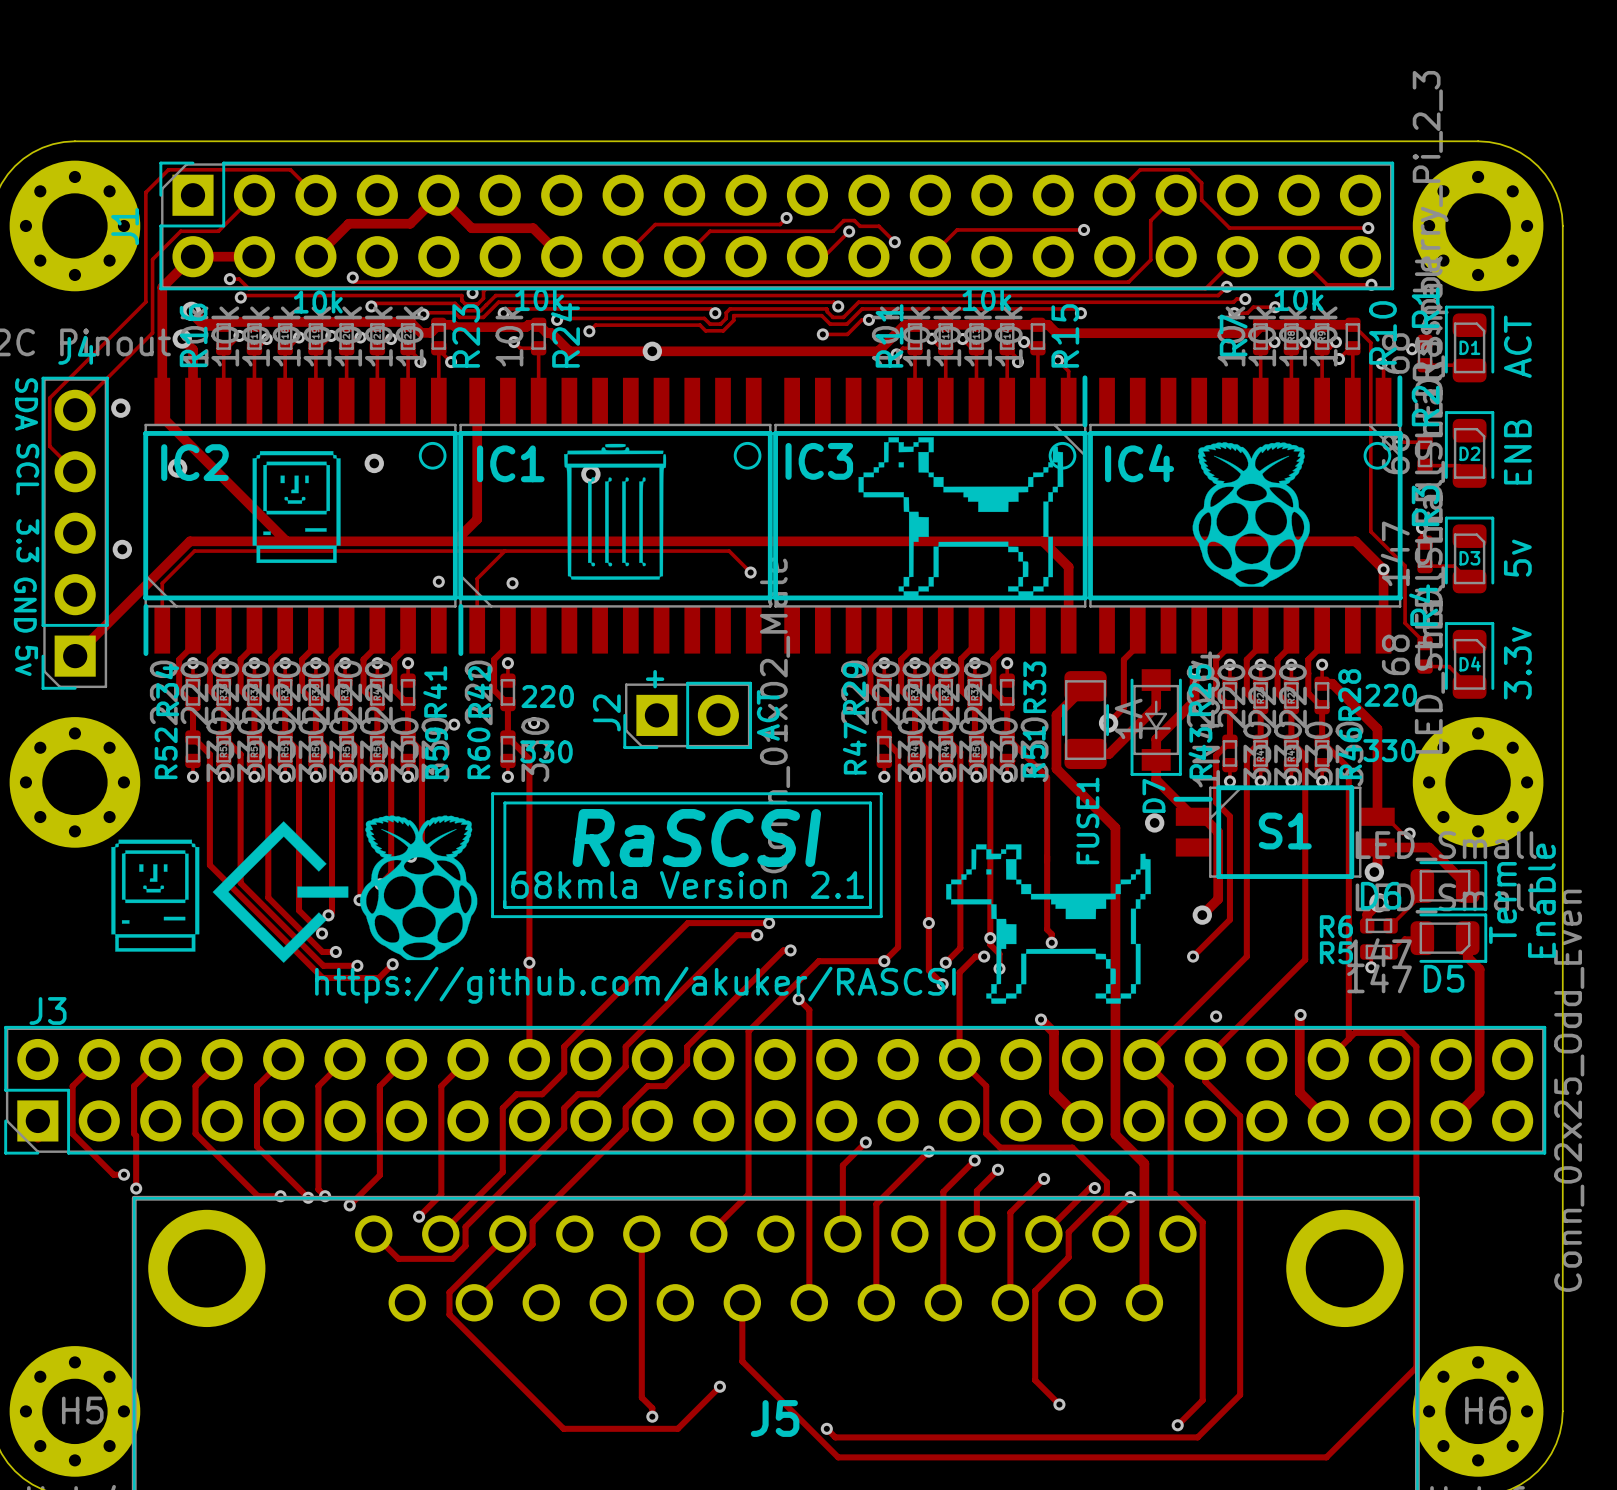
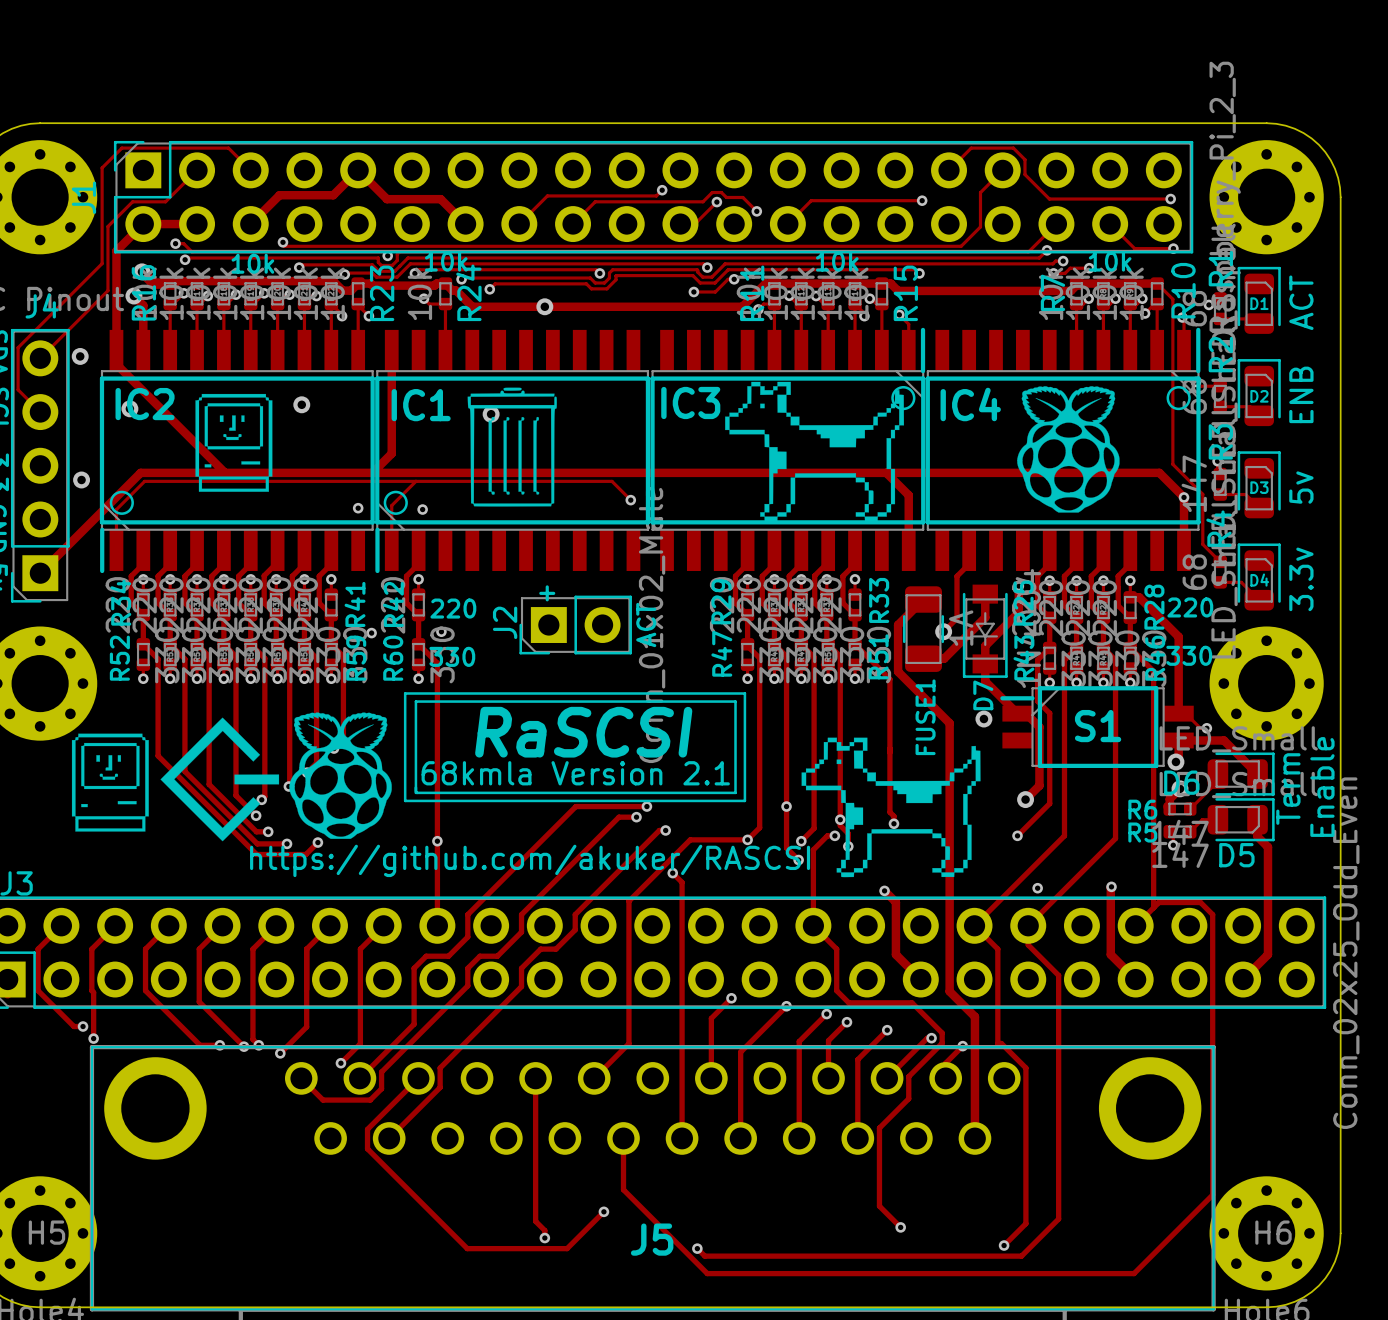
drawing: [733, 441, 762, 470] -> none
drawing position: (432, 455) -> (395, 502)
drawing: none -> [109, 490, 134, 515]

